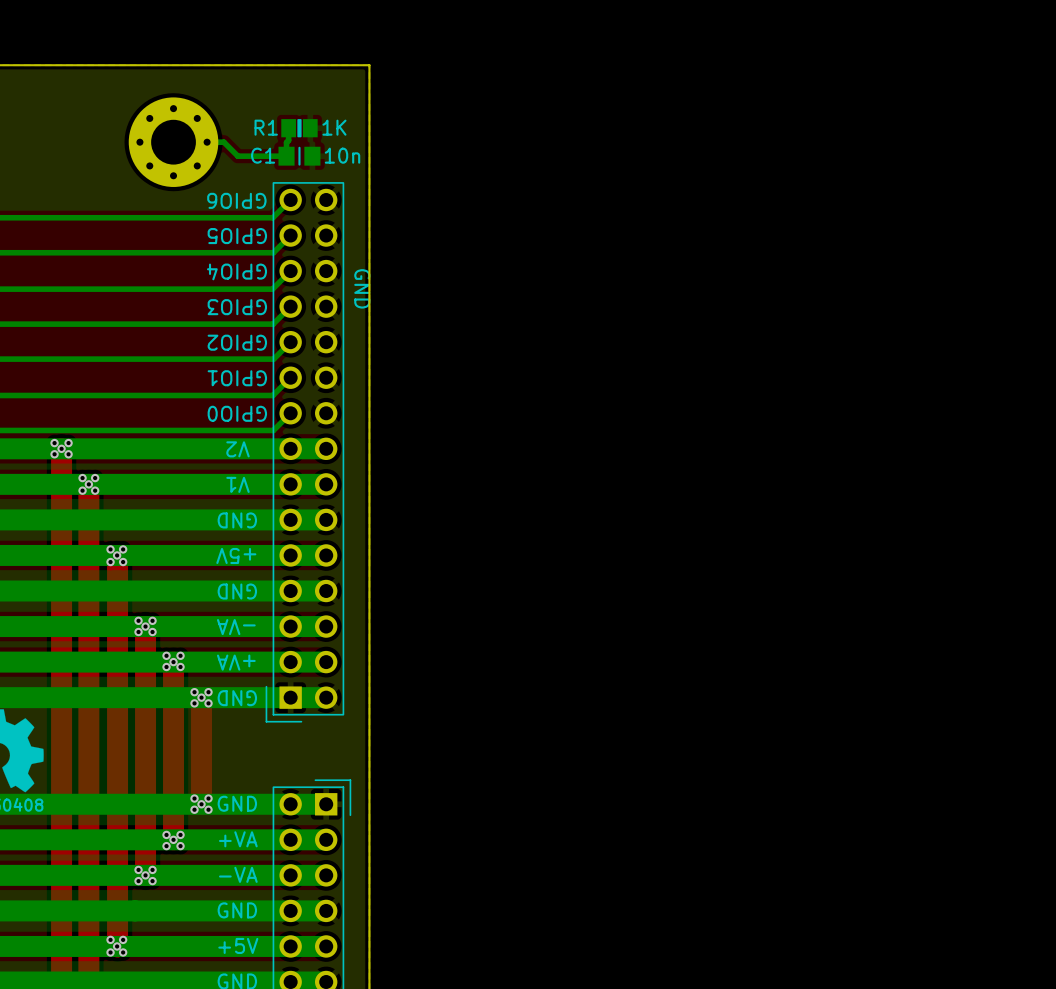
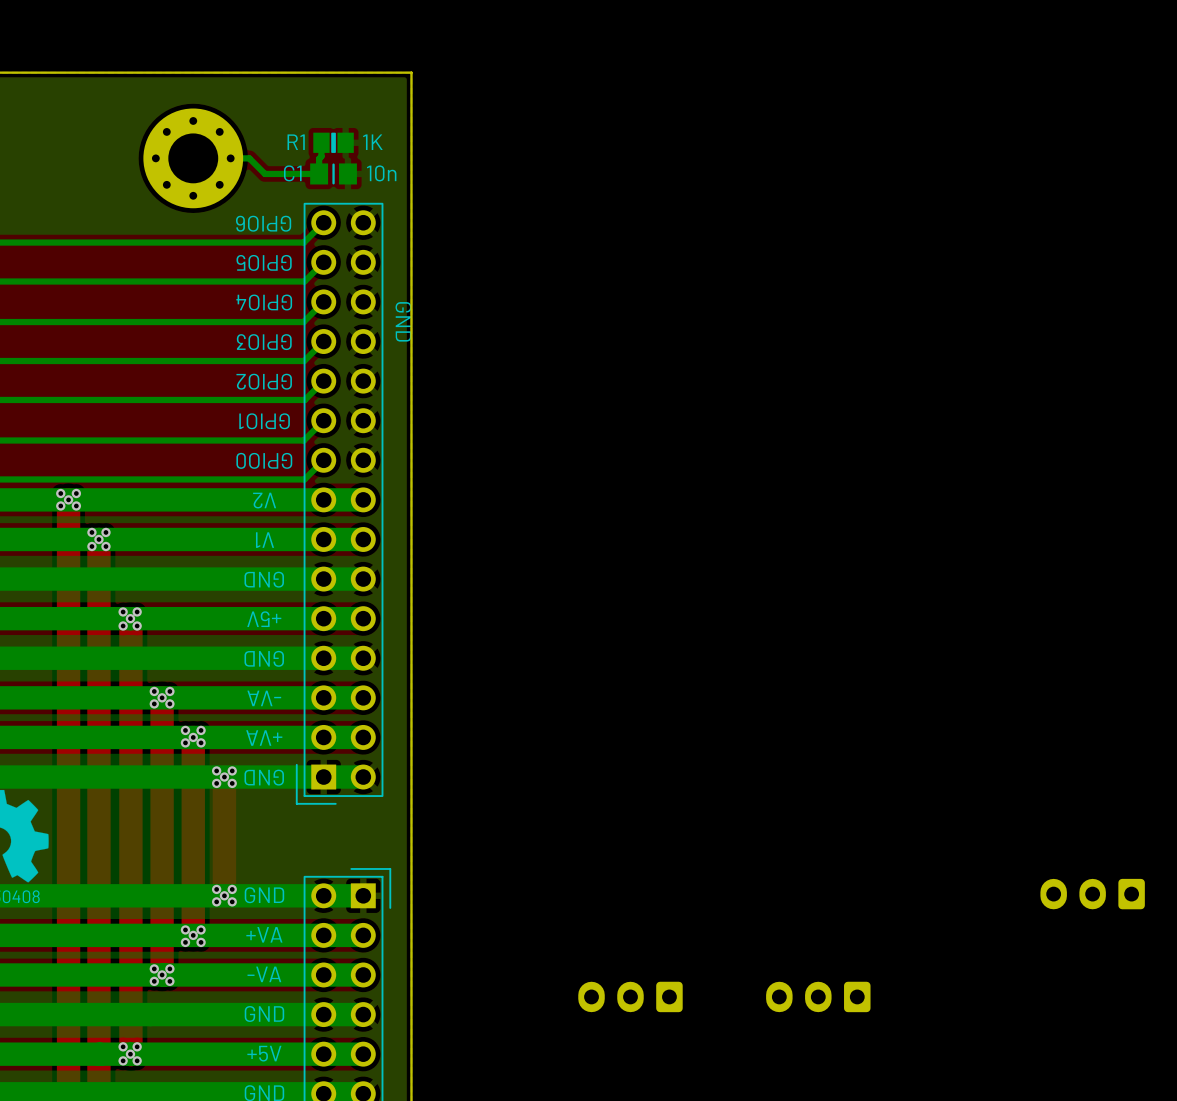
part: none -> (1092, 894)
part: none -> (630, 996)
part: none -> (818, 996)

